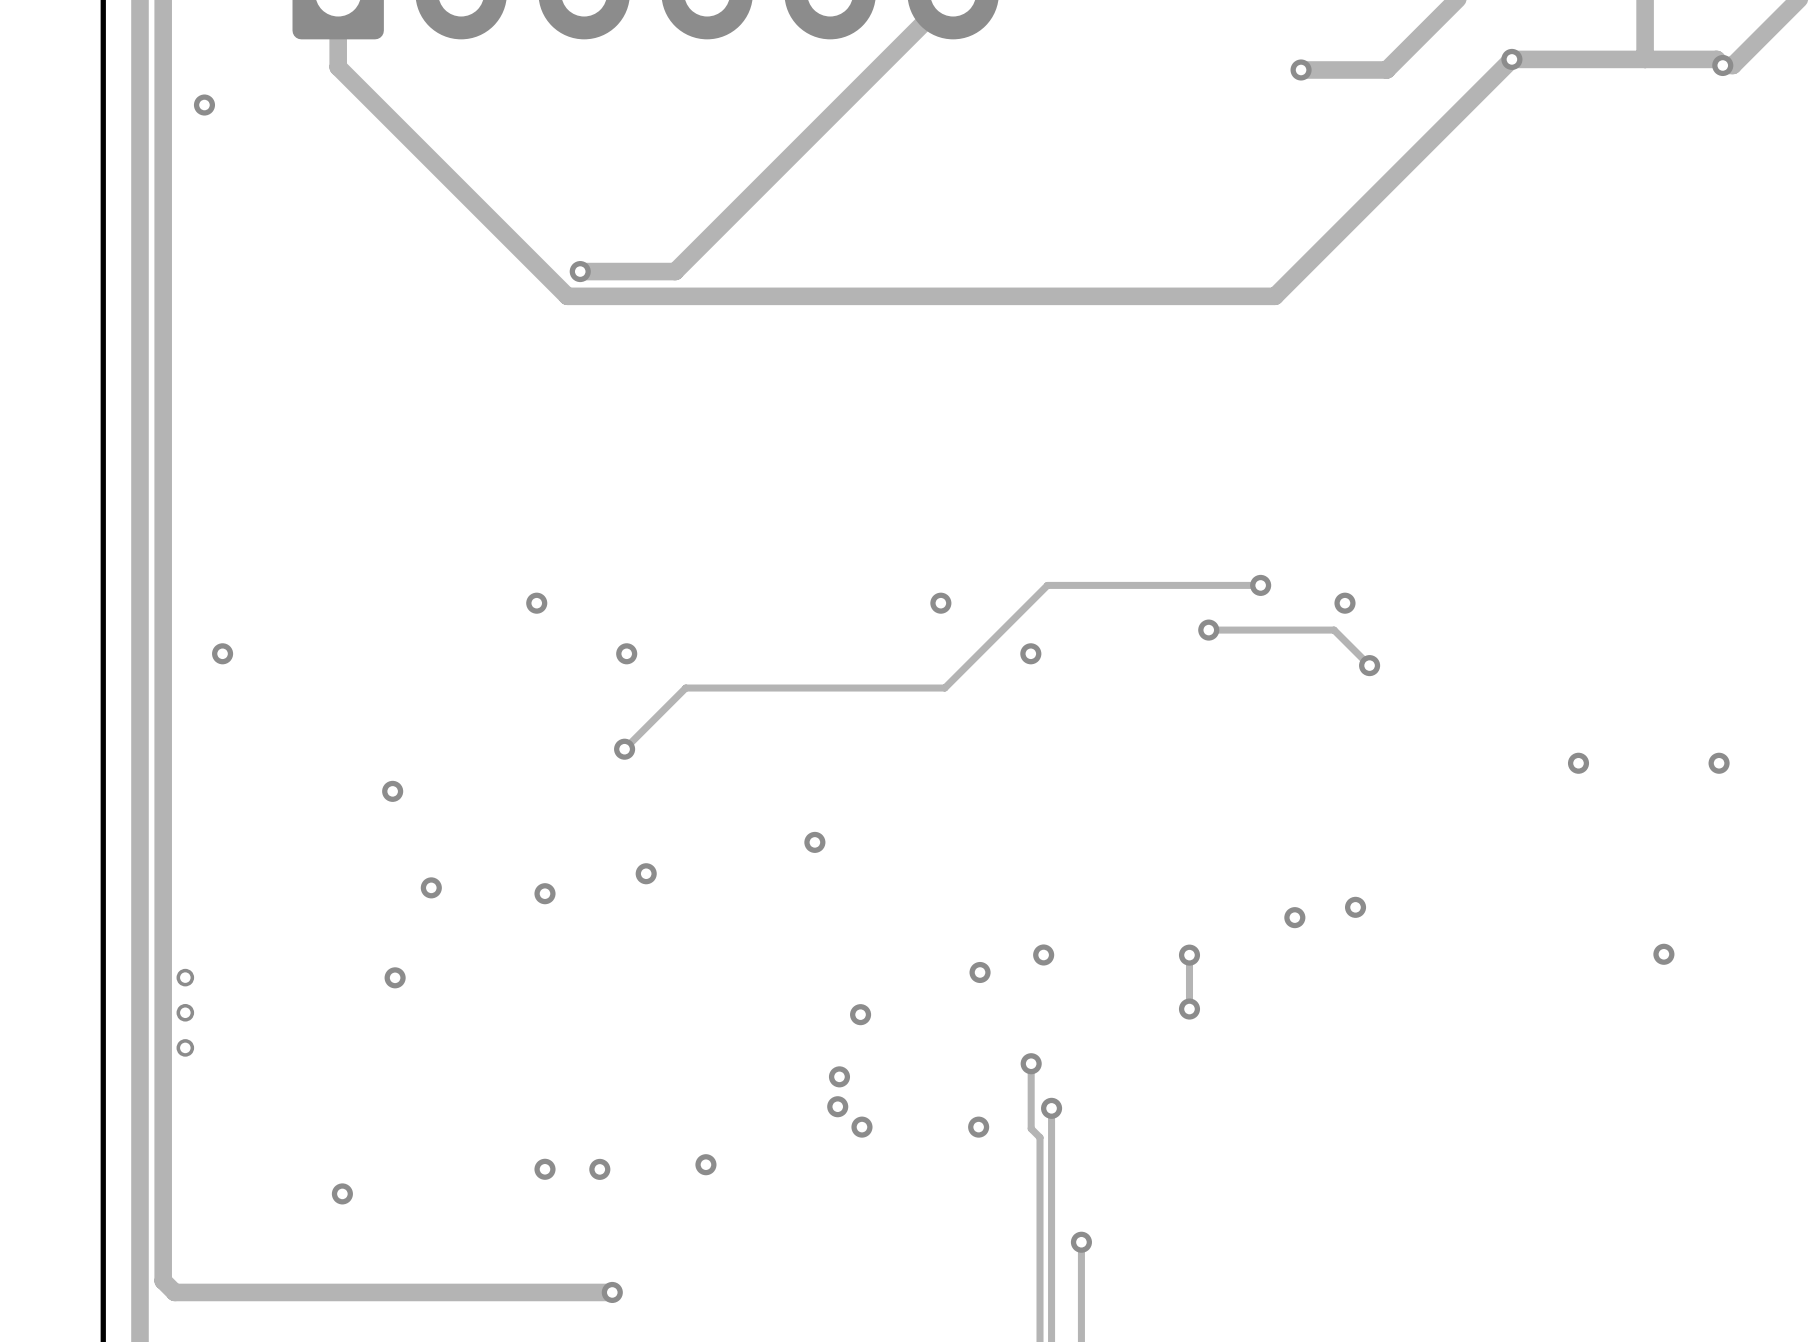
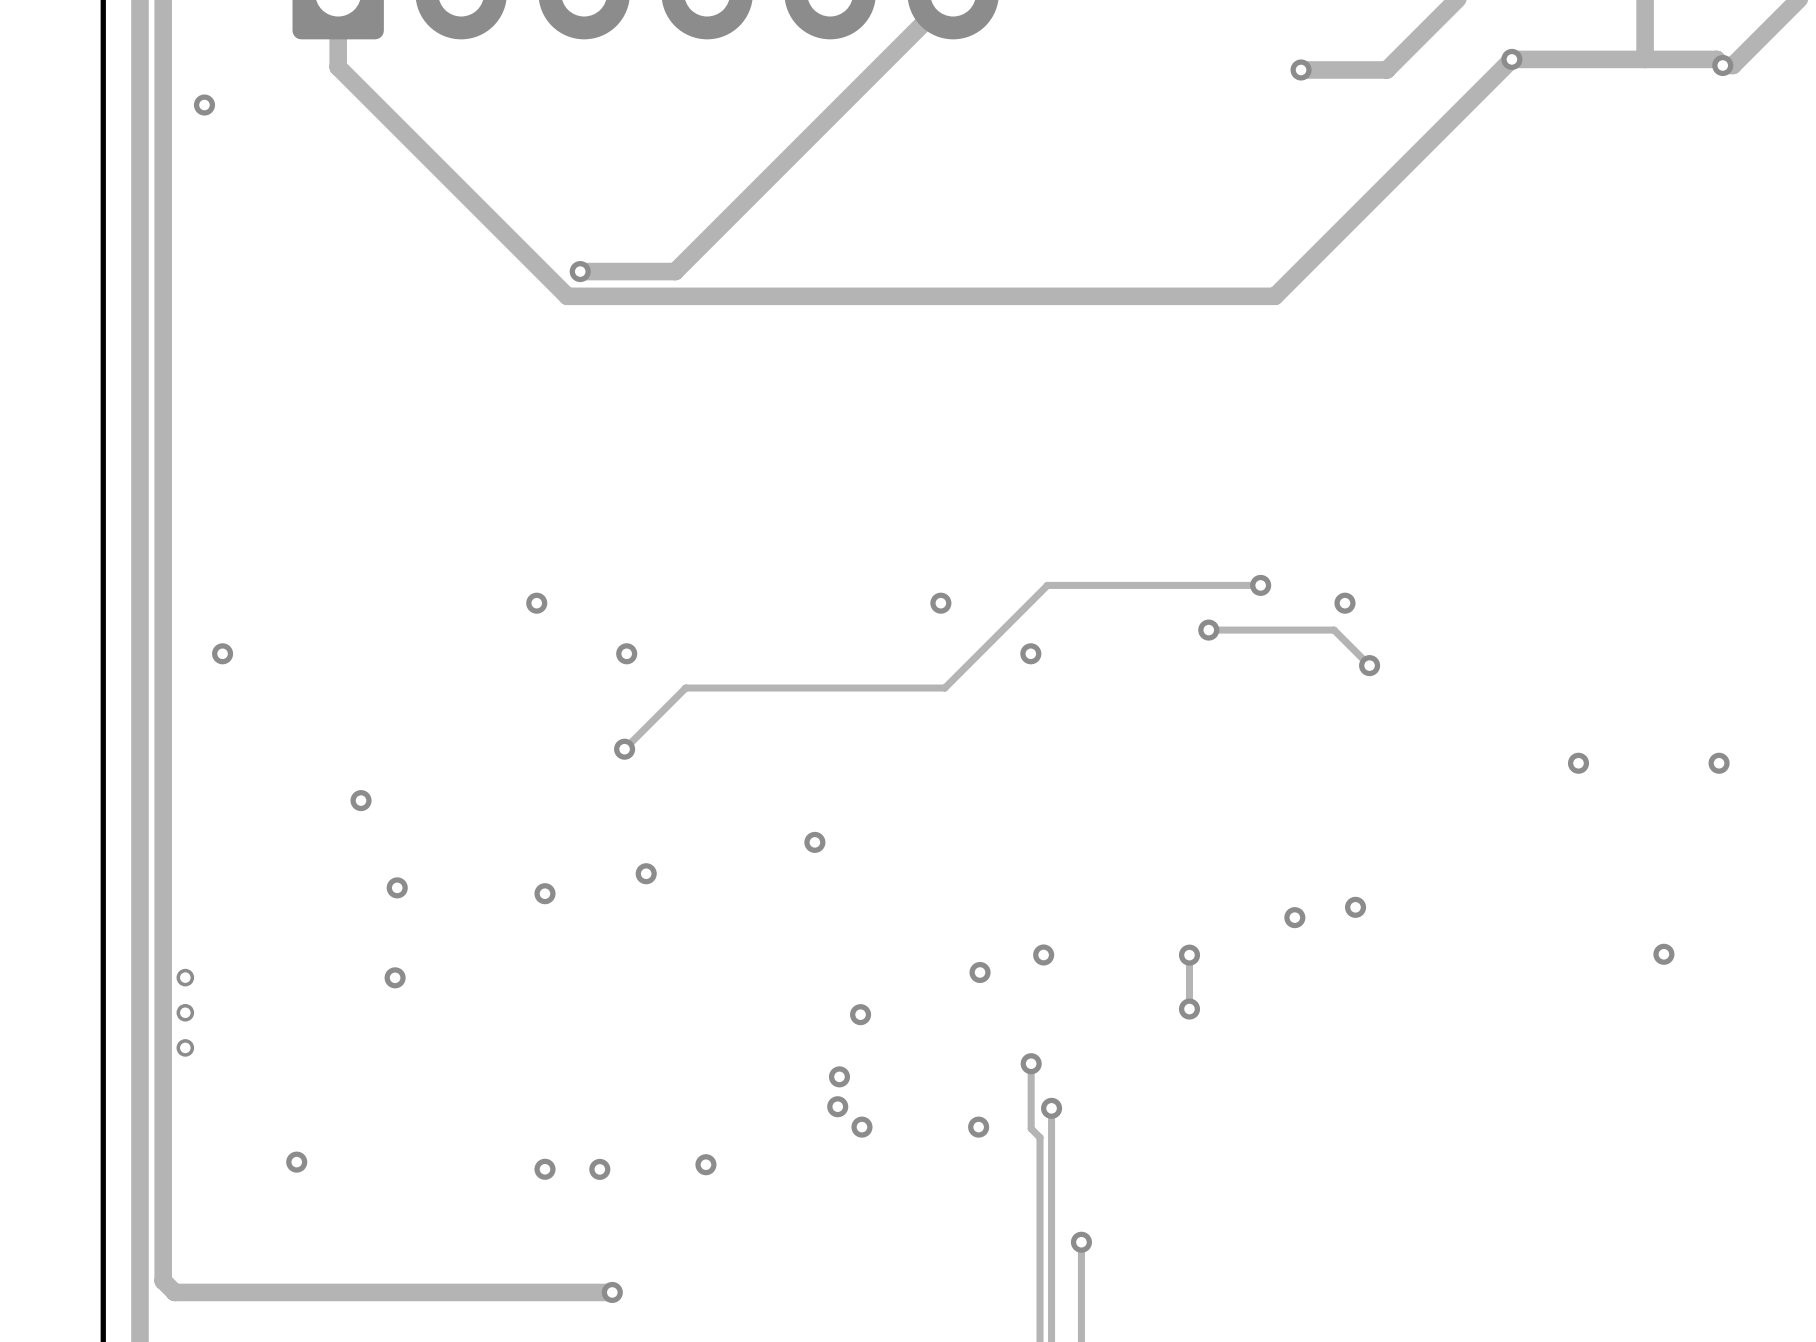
via position: (392, 791) -> (361, 800)
via position: (431, 887) -> (397, 887)
via position: (342, 1193) -> (296, 1162)

